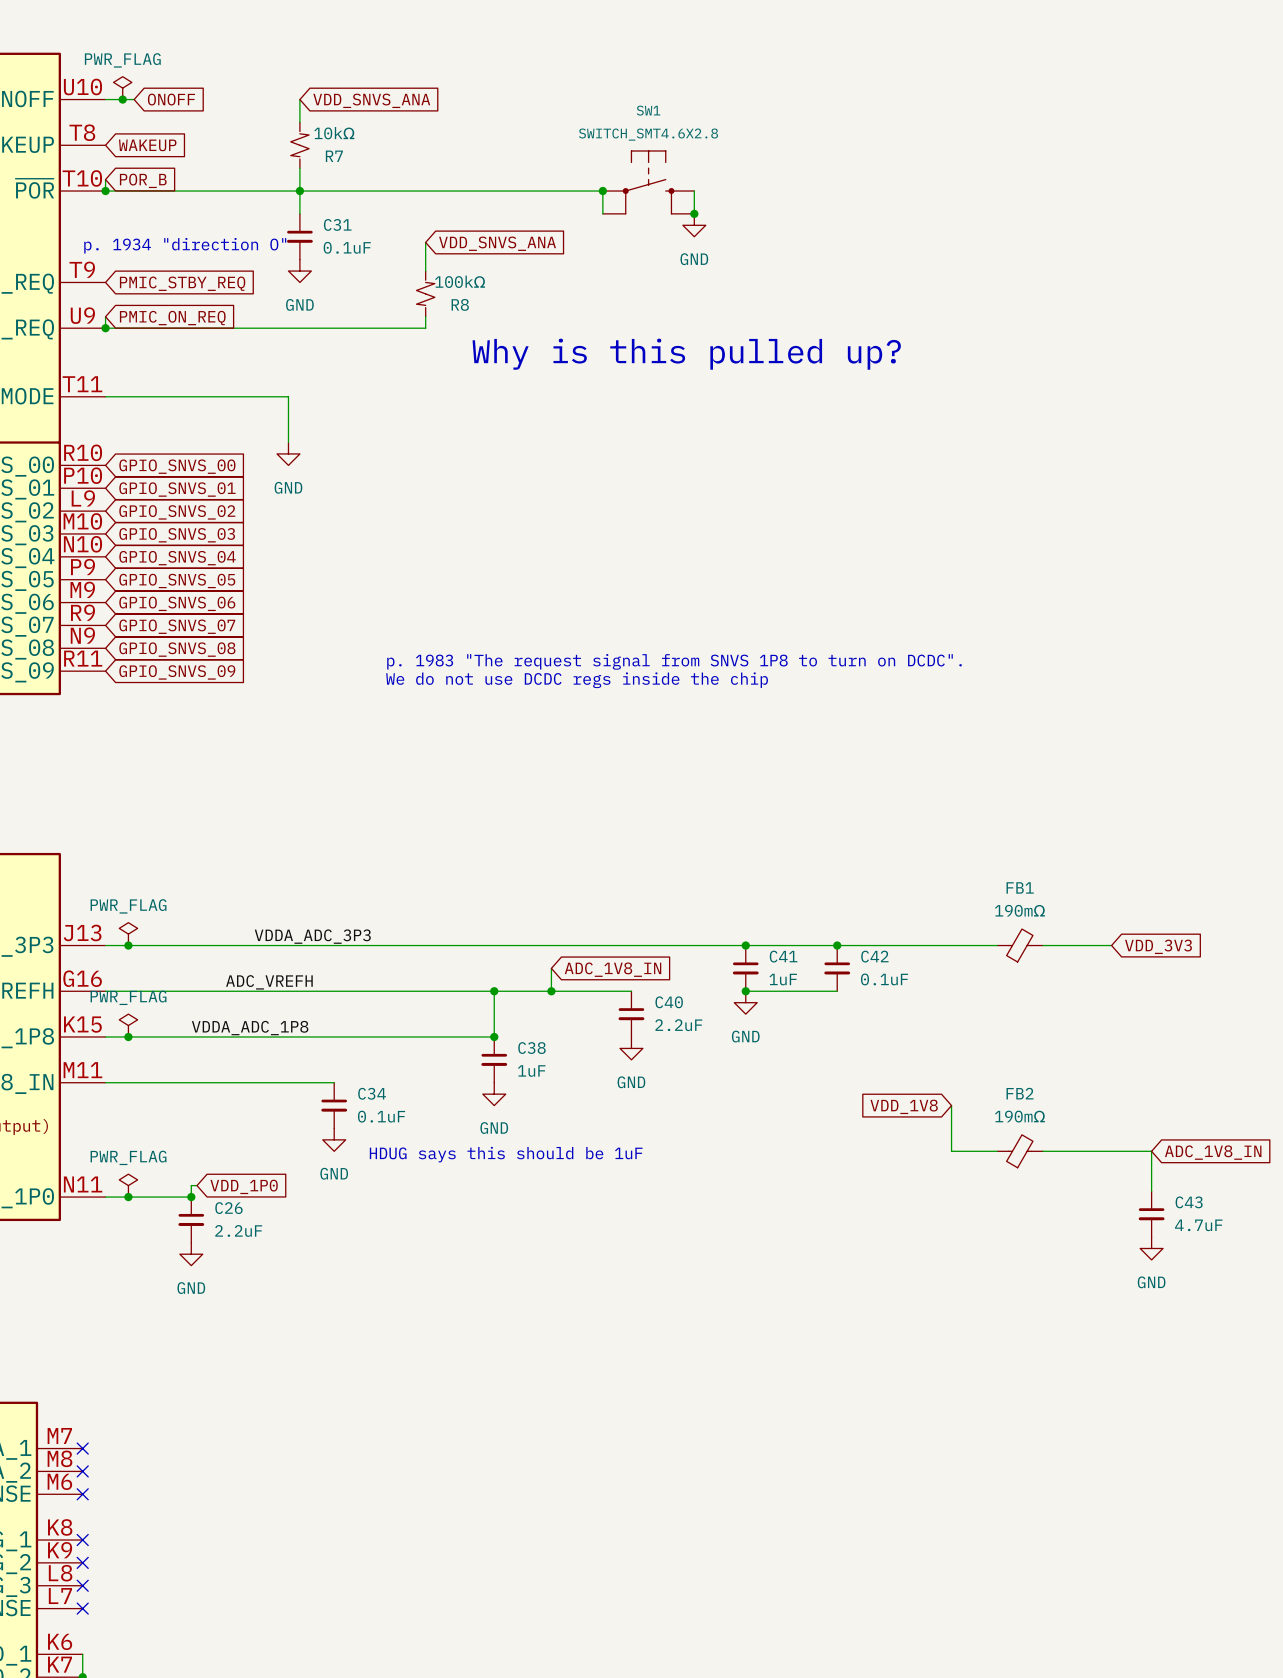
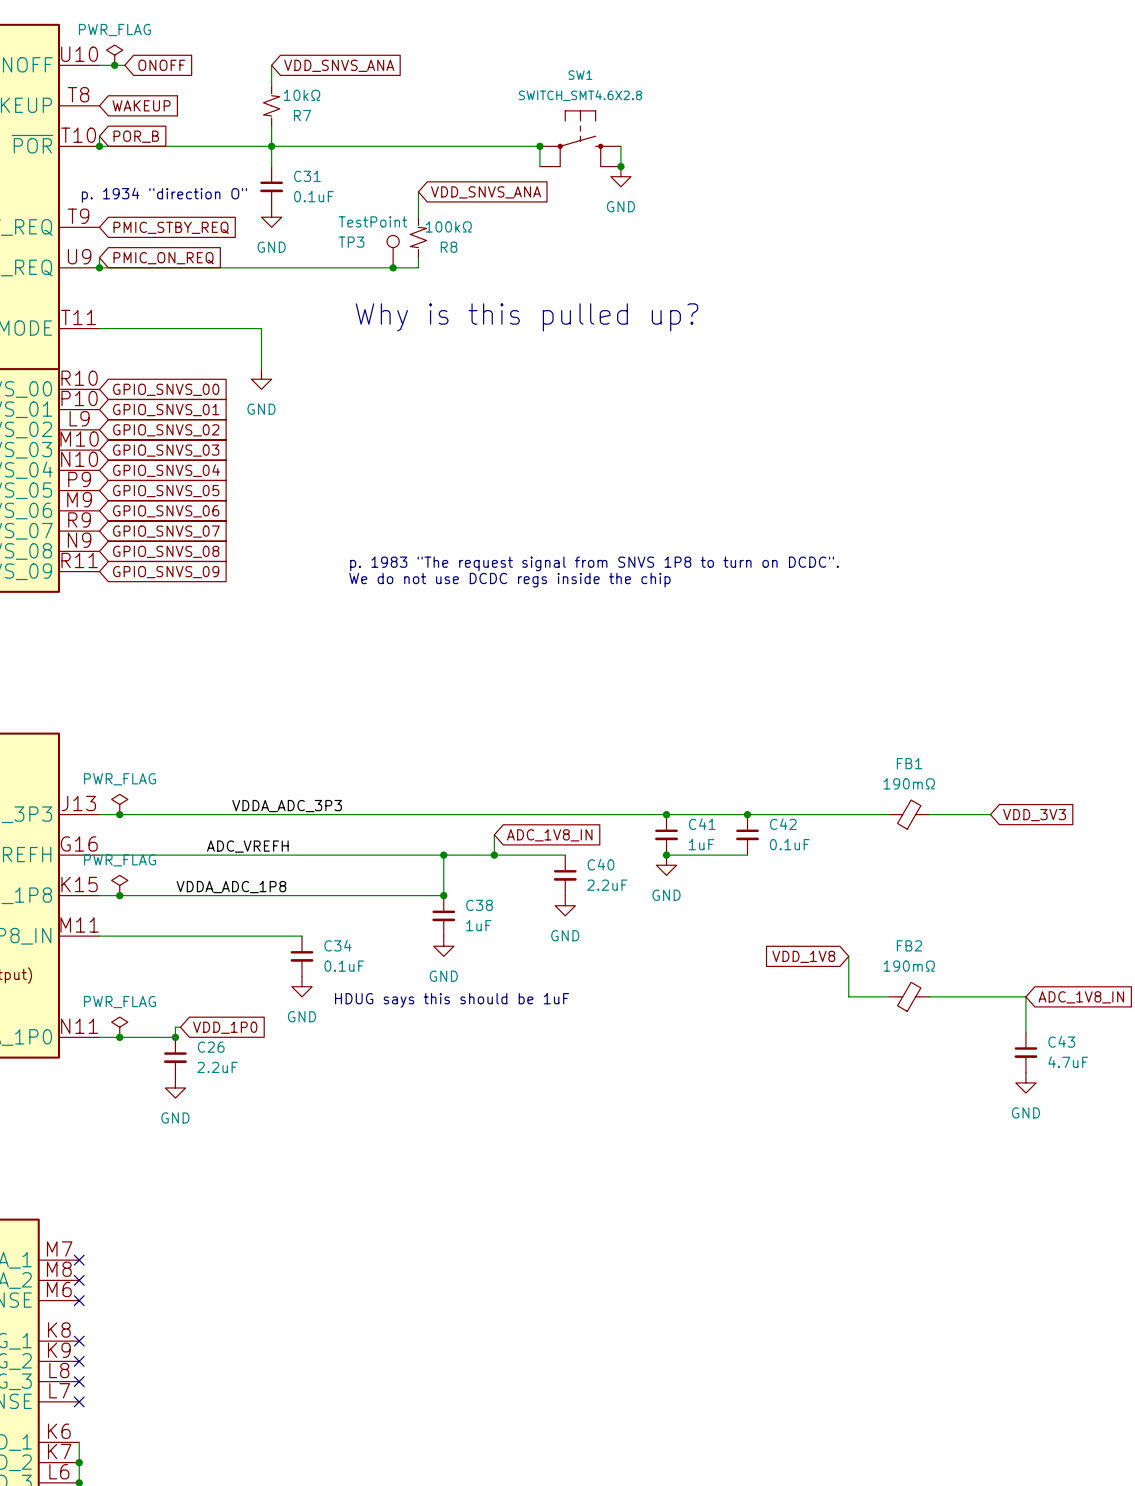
wire: (425, 242) (425, 271) -> (418, 191) (418, 217)
global label position: VDD_SNVS_ANA (497, 243) -> VDD_SNVS_ANA (486, 192)
R8 position: (425, 293) -> (418, 237)
TP3: none -> TestPoint (393, 251)
wire: (425, 316) (425, 328) -> (418, 257) (418, 267) (383, 267)
junction: none -> (393, 267)
text position: Why is this pulled up? (686, 354) -> Why is this pulled up? (527, 317)

